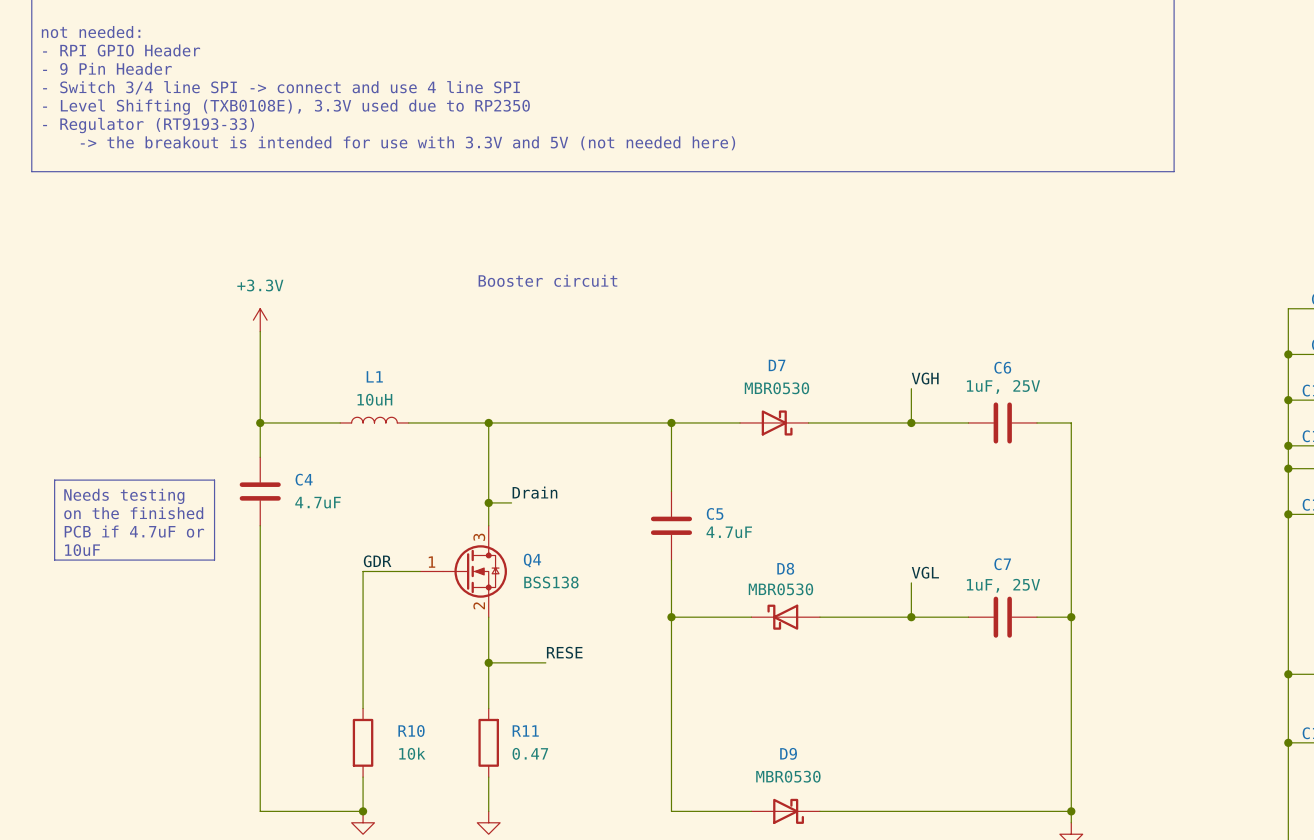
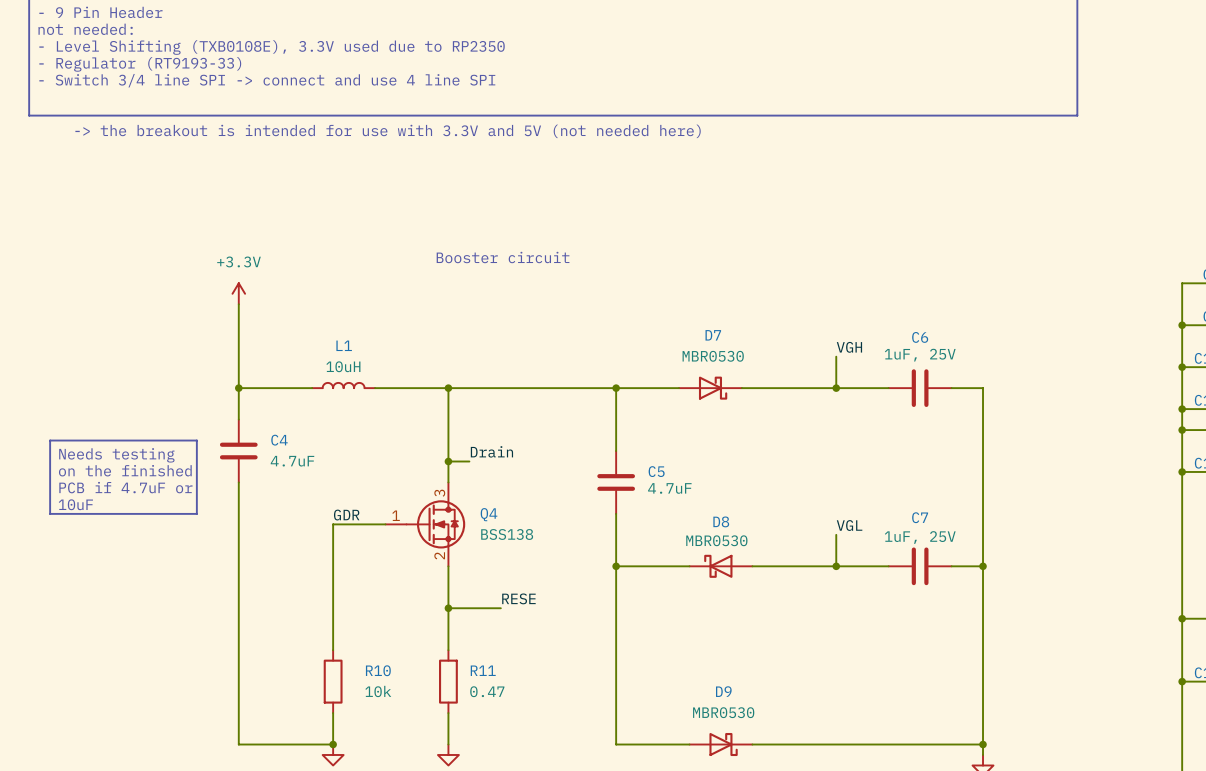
text: none -> - 9 Pin Header (100, 12)
text: - RPI GPIO Header (121, 50) -> - Level Shifting (TXB0108E), 3.3V used due to RP2350 (272, 47)
text: - 9 Pin Header (107, 68) -> - Regulator (RT9193-33) (140, 64)
text: - Level Shifting (TXB0108E), 3.3V used due to RP2350 (286, 107) -> none
line: (31, 125) (31, 171) (1174, 171) (1174, 125) -> (29, 115) (1077, 115)
text: - Regulator (RT9193-33) (148, 125) -> none

